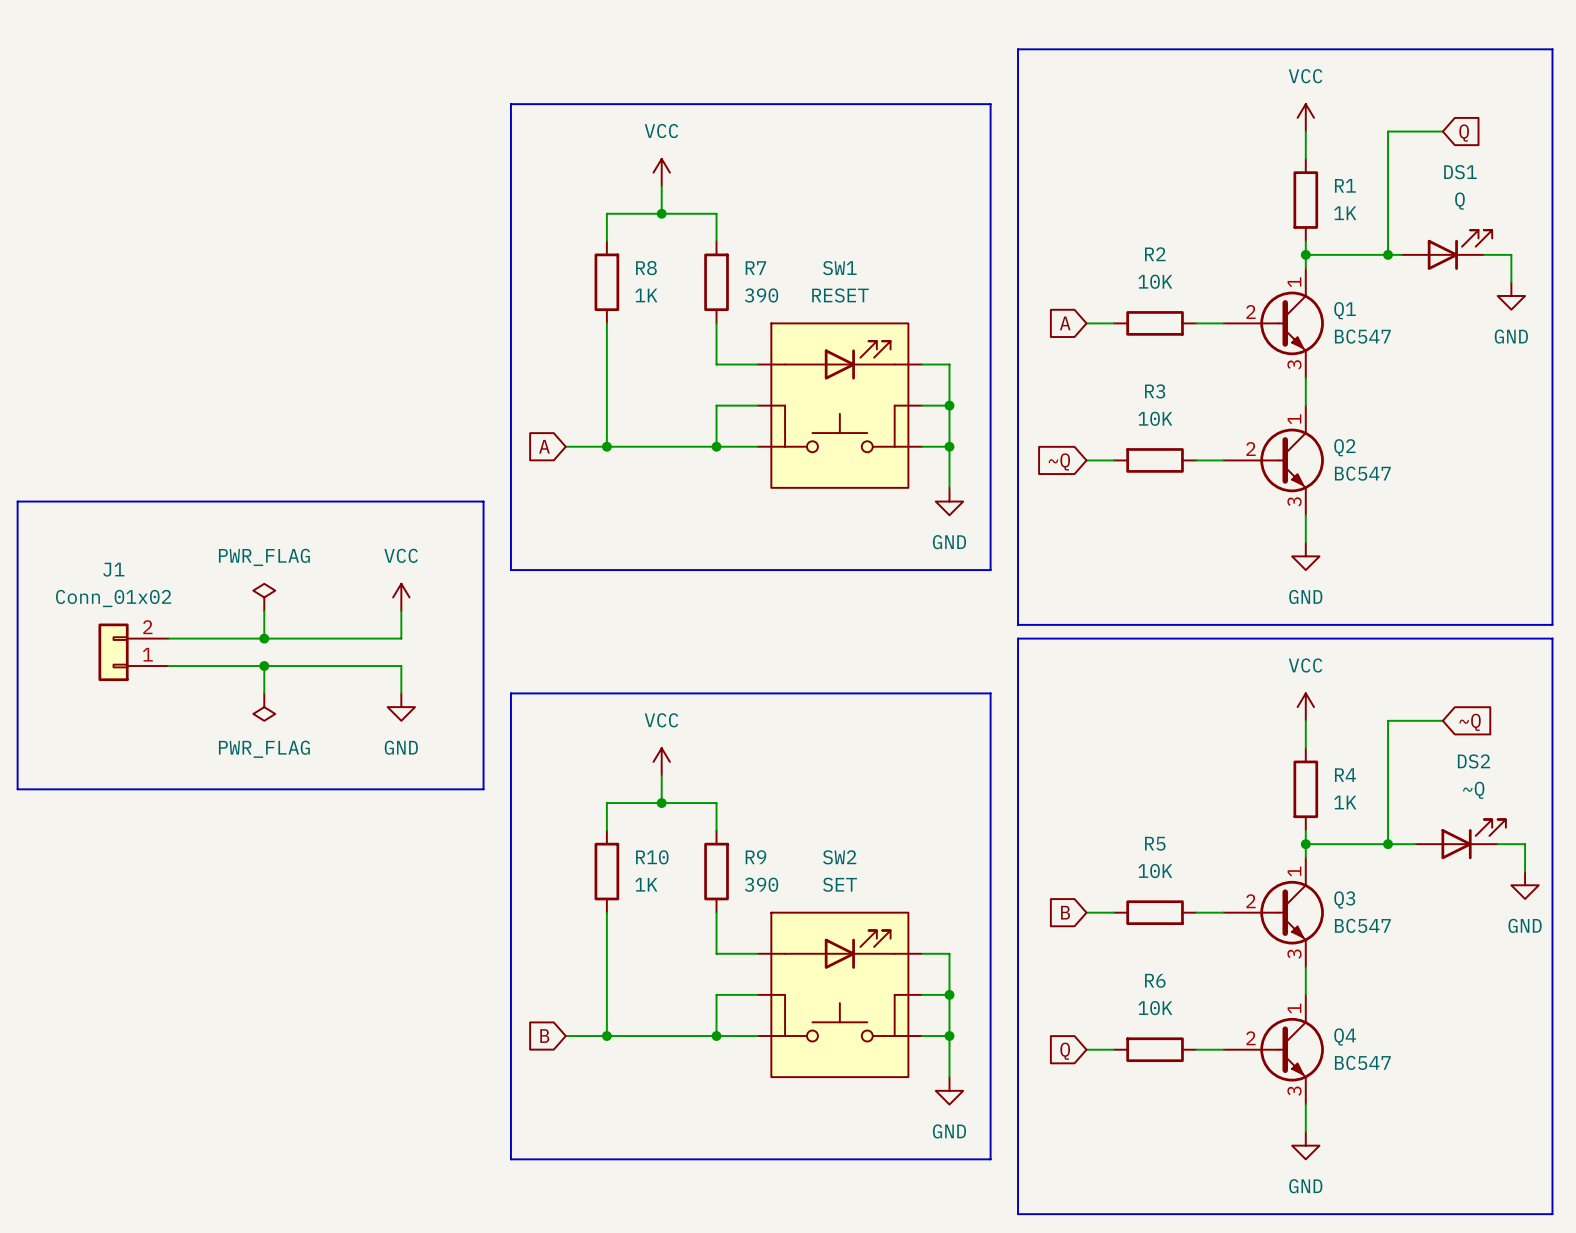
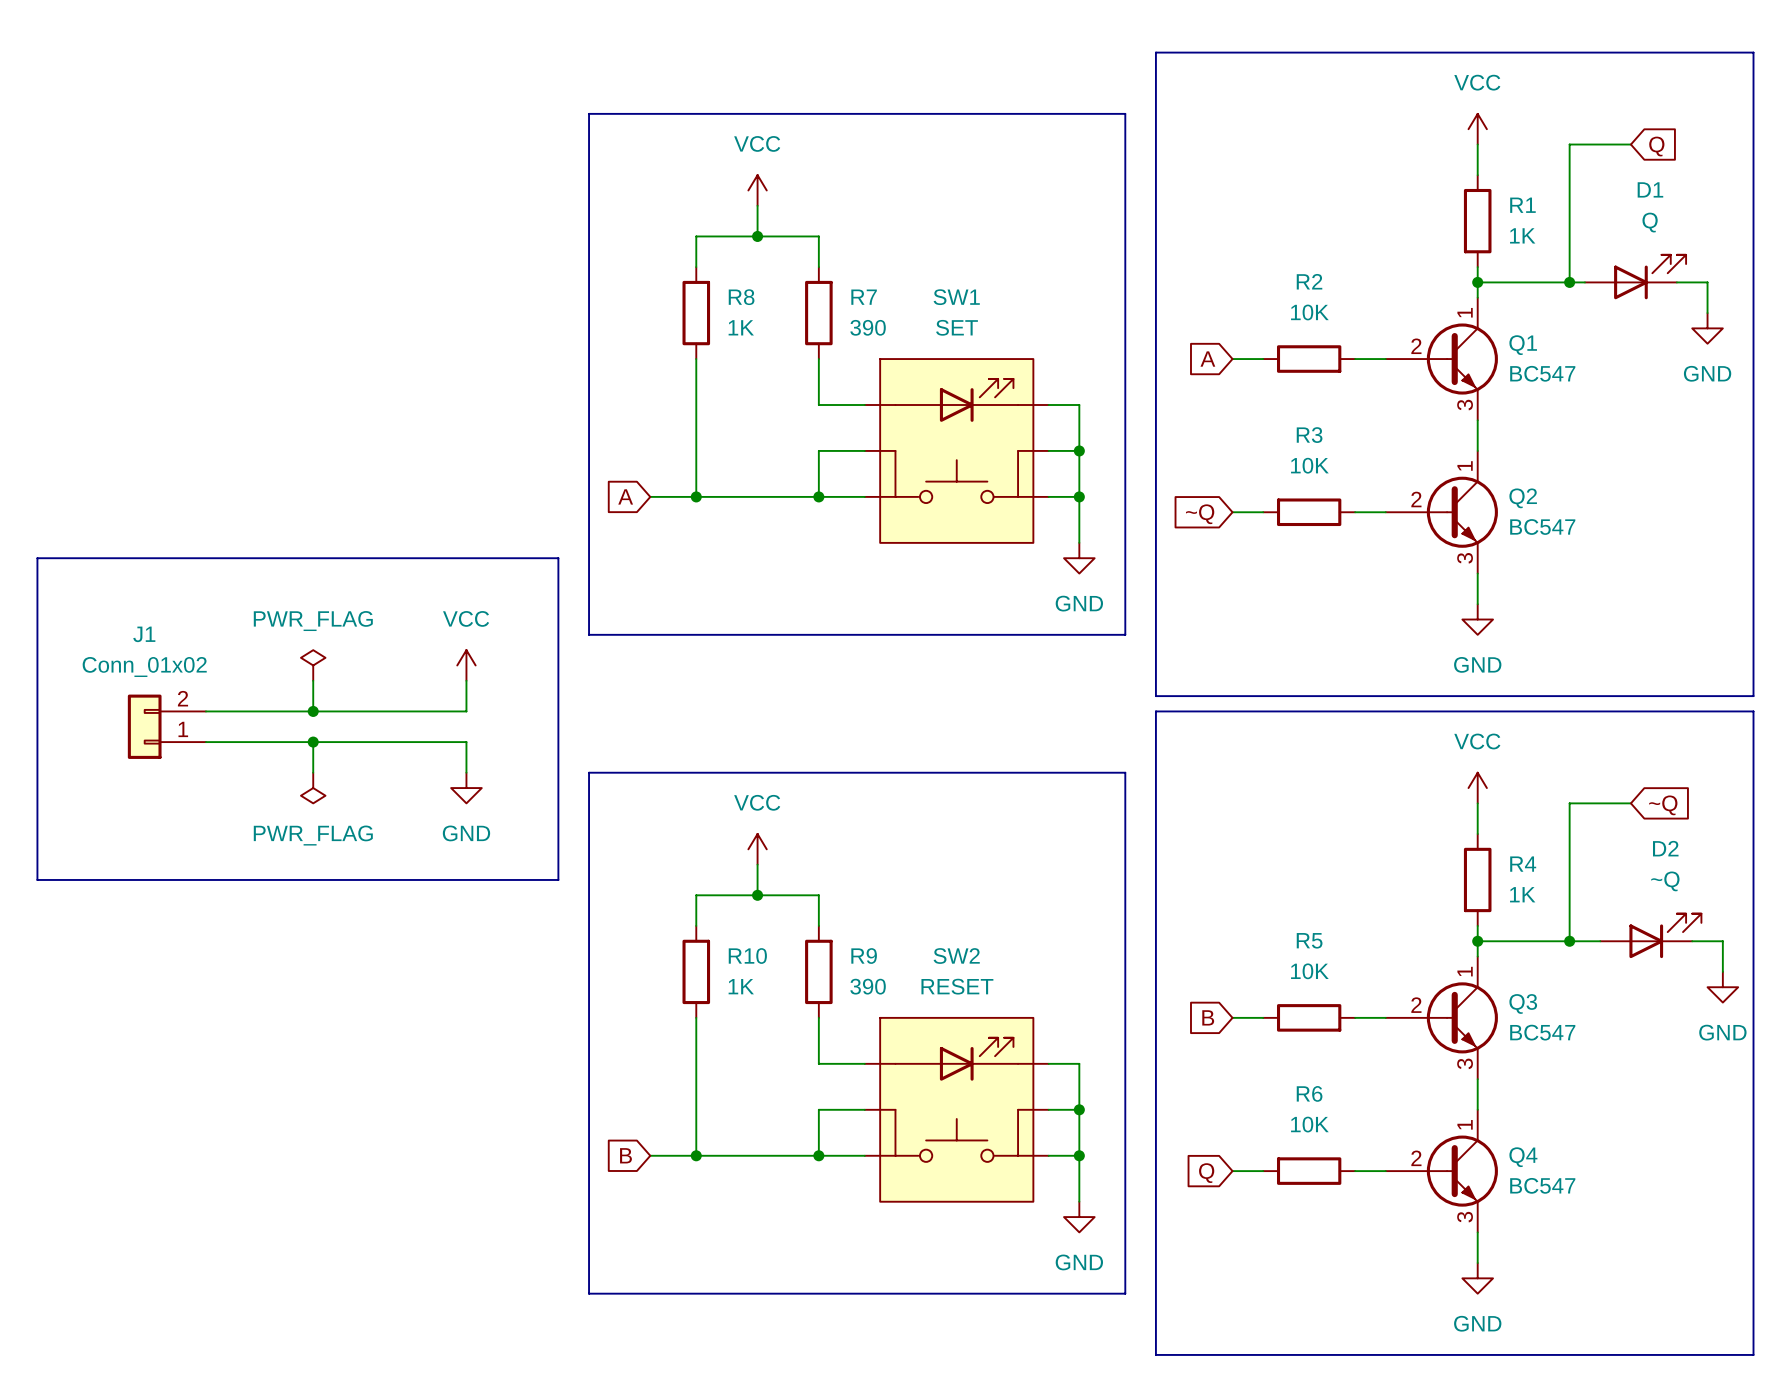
DS1 name: DS1 (1460, 172) -> D1 (1650, 189)
SW1 value: RESET (840, 295) -> SET (957, 327)
DS2 name: DS2 (1473, 761) -> D2 (1665, 848)
SW2 value: SET (840, 884) -> RESET (957, 986)

